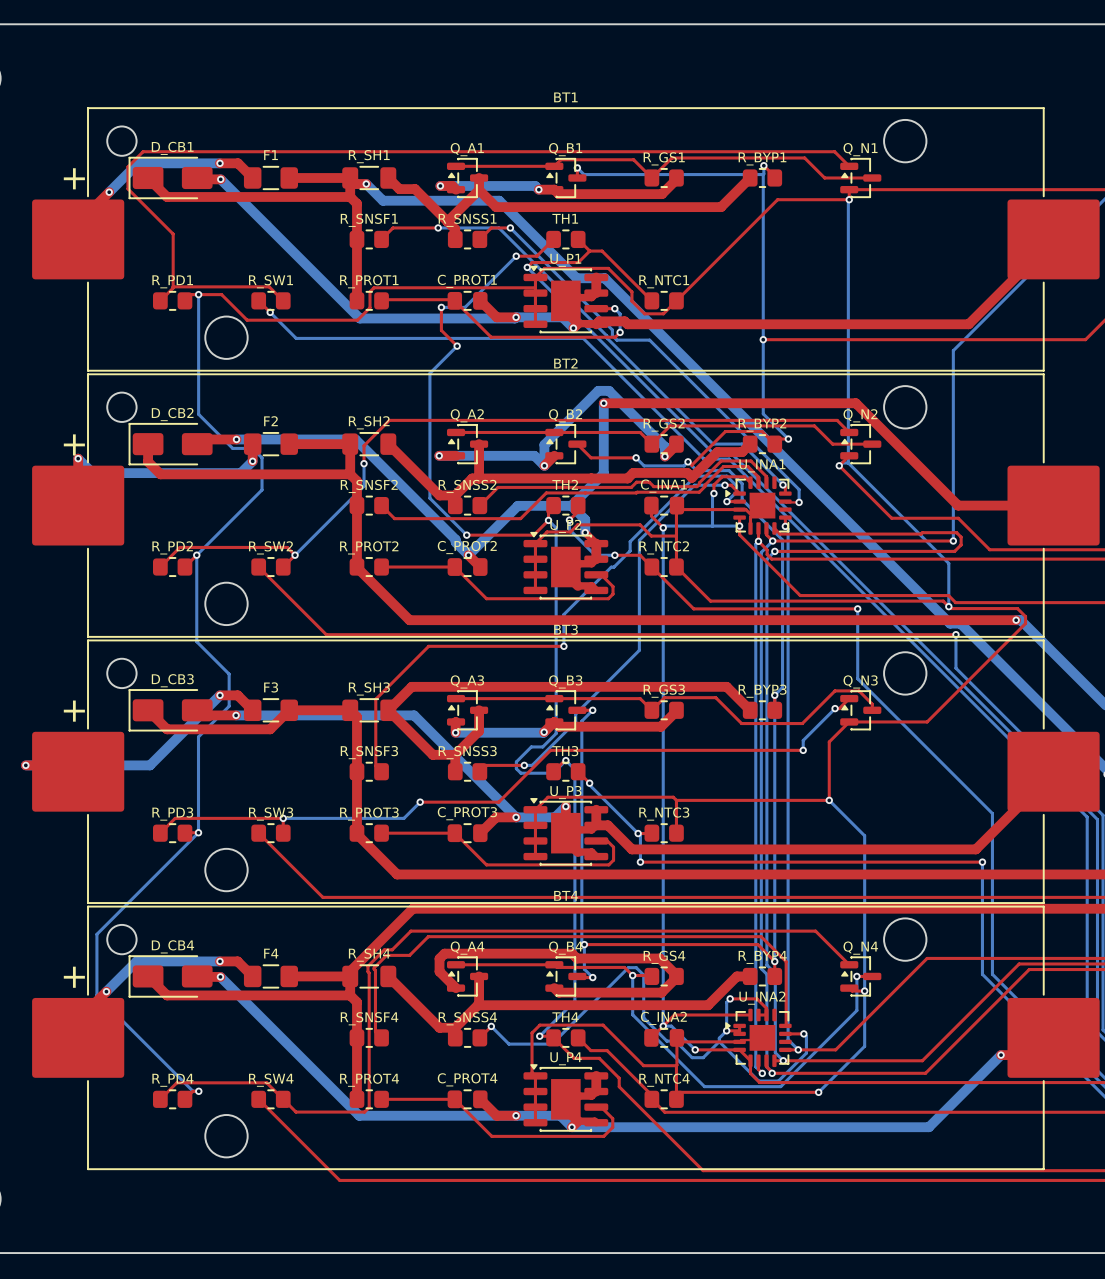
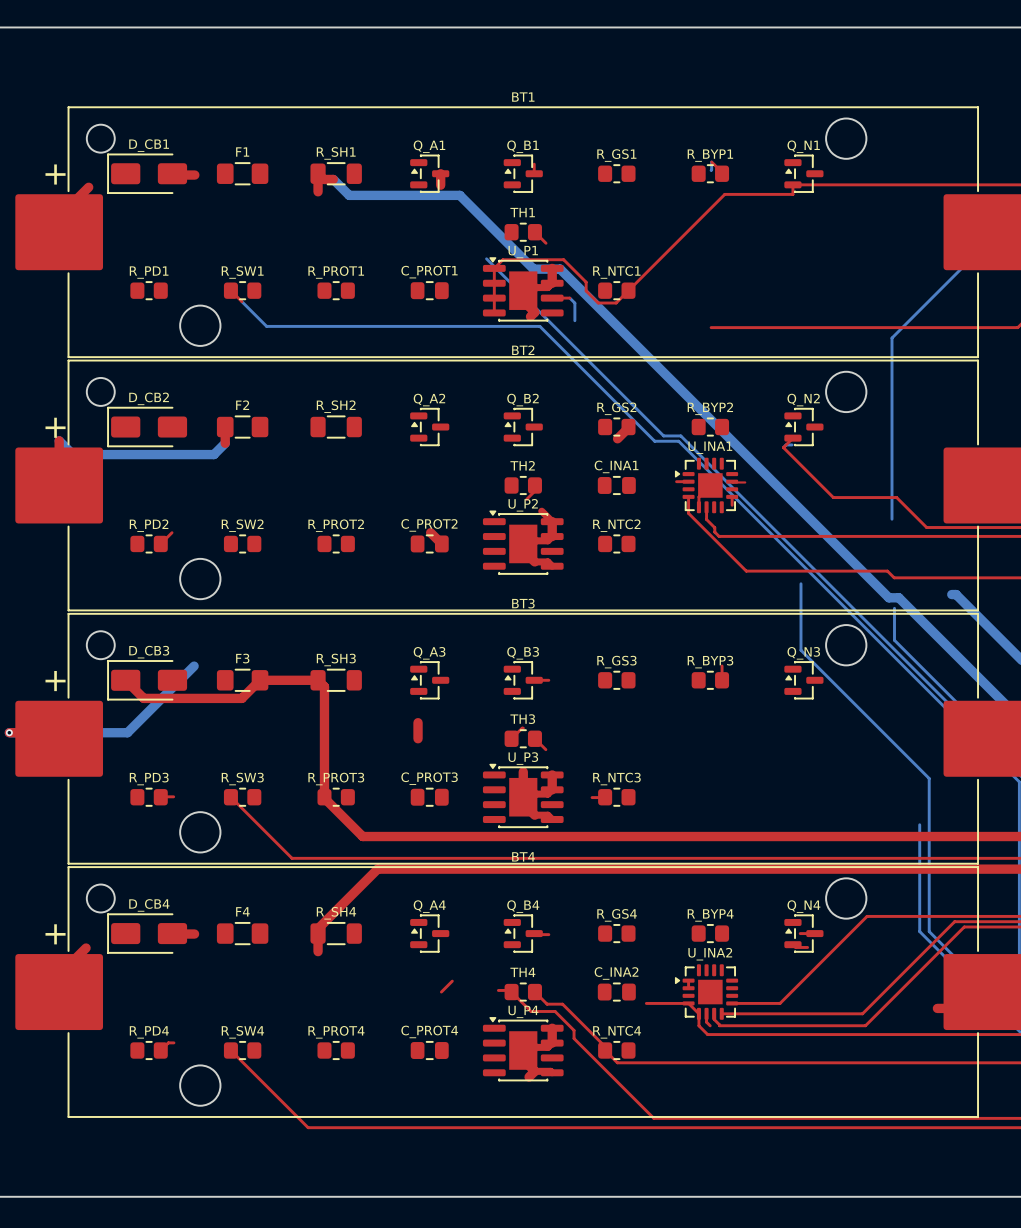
top track: (220, 163) (238, 163) (252, 177) -> none
bottom track: (220, 163) (138, 163) (109, 192) -> none
via: (220, 163) -> none
via: (763, 165) -> none
top track: (456, 166) (554, 166) (560, 159) (633, 159) (651, 177) (671, 157) (804, 157) (824, 177) (872, 177) -> none
top track: (849, 166) (834, 151) (143, 151) (127, 166) (127, 188) (173, 234) (173, 288) (160, 300) -> none
bottom track: (577, 167) (584, 174) (763, 174) (763, 413) (788, 439) -> none
via: (577, 167) -> none
top track: (148, 177) (167, 196) (350, 196) (356, 203) (356, 300) -> none
top track: (289, 177) (350, 177) -> none
top track: (388, 177) (399, 189) (415, 189) (455, 229) (455, 239) -> none
top track: (676, 177) (661, 194) (558, 194) (554, 189) (538, 189) -> none
top track: (750, 177) (721, 207) (496, 207) (479, 190) (447, 221) -> none
bottom track: (220, 179) (359, 318) (562, 317) (573, 328) -> none
via: (220, 179) -> none
via: (366, 183) -> none
top track: (440, 185) (452, 185) (456, 189) -> none
bottom track: (440, 185) (535, 185) (538, 189) -> none
via: (440, 185) -> none
via: (538, 189) -> none
via: (109, 192) -> none
bottom track: (849, 199) (848, 462) (948, 563) (948, 606) -> none
via: (849, 199) -> none
top track: (438, 227) (393, 227) (381, 239) -> none
bottom track: (438, 227) (498, 227) (713, 444) (742, 444) (782, 484) -> none
via: (438, 227) -> none
top track: (510, 227) (491, 227) (479, 239) -> none
bottom track: (510, 227) (612, 329) (612, 335) (616, 340) (649, 340) (799, 489) (799, 502) -> none
via: (510, 227) -> none
R_SNSF1: (369, 239) -> none
R_SNSS1: (467, 239) -> none
top track: (553, 239) (536, 256) (516, 256) -> none
top track: (1053, 239) (968, 324) (627, 324) (624, 321) (599, 321) (596, 324) (577, 323) -> none
bottom track: (516, 256) (465, 307) (441, 307) -> none
via: (516, 256) -> none
top track: (527, 267) (532, 262) (578, 262) (589, 251) (602, 251) (651, 300) -> none
via: (527, 267) -> none
top track: (173, 286) (269, 286) (283, 300) -> none
top track: (535, 287) (374, 287) (370, 291) (370, 307) (357, 320) (247, 320) (221, 294) (191, 294) (184, 300) -> none
bottom track: (198, 294) (198, 414) (232, 448) (252, 448) (262, 457) (262, 489) (196, 555) (196, 641) (229, 674) (229, 706) (198, 736) (198, 832) (96, 934) (96, 995) (193, 1091) (198, 1091) -> none
via: (198, 294) -> none
top track: (381, 300) (453, 299) (491, 337) (615, 337) (620, 332) -> none
top track: (480, 300) (496, 317) (516, 317) -> none
top track: (441, 307) (441, 330) (457, 346) -> none
via: (441, 307) -> none
via: (614, 308) -> none
via: (270, 312) -> none
via: (516, 317) -> none
via: (573, 328) -> none
via: (620, 332) -> none
via: (763, 339) -> none
bottom track: (457, 346) (429, 373) (429, 498) (466, 535) -> none
via: (457, 346) -> none
top track: (603, 403) (855, 403) (958, 505) (1053, 505) -> none
bottom track: (603, 403) (603, 473) (571, 505) -> none
via: (603, 403) -> none
top track: (456, 432) (640, 432) (651, 444) (670, 425) (814, 425) (832, 444) (872, 444) -> none
top track: (849, 432) (837, 420) (389, 420) (364, 445) (364, 463) -> none
top track: (236, 439) (201, 439) (197, 444) -> none
bottom track: (236, 439) (355, 439) (455, 539) (455, 542) (468, 555) (517, 505) (571, 505) -> none
via: (236, 439) -> none
top track: (788, 439) (779, 439) (774, 444) (762, 431) (725, 431) (691, 465) (688, 461) -> none
via: (788, 439) -> none
top track: (148, 444) (148, 461) (160, 474) (350, 474) -> none
top track: (289, 444) (350, 444) (350, 474) -> none
top track: (388, 444) (439, 495) (455, 495) -> none
top track: (479, 444) (479, 478) -> none
top track: (577, 444) (591, 457) (636, 457) -> none
top track: (750, 444) (742, 452) (717, 452) (691, 477) (687, 472) (633, 472) (627, 478) (472, 478) (455, 495) -> none
top track: (439, 455) (456, 455) -> none
bottom track: (439, 455) (534, 455) (544, 465) (544, 444) (598, 390) (609, 390) (664, 446) (664, 456) -> none
via: (439, 455) -> none
top track: (554, 455) (544, 465) -> none
via: (664, 456) -> none
bottom track: (636, 457) (644, 465) (684, 465) (688, 461) (696, 470) (729, 470) (742, 483) (742, 499) (782, 539) (782, 687) (774, 695) (774, 961) -> none
via: (636, 457) -> none
via: (78, 458) -> none
via: (252, 461) -> none
via: (688, 461) -> none
bottom track: (364, 463) (364, 486) (295, 555) -> none
via: (364, 463) -> none
via: (544, 465) -> none
via: (839, 465) -> none
top track: (350, 474) (356, 481) (356, 567) (409, 620) (1016, 620) -> none
top track: (750, 482) (744, 476) (722, 476) (713, 485) (713, 493) -> none
top track: (758, 482) (758, 477) (747, 466) (723, 466) (699, 492) (546, 492) (520, 518) (394, 518) (381, 505) -> none
top track: (766, 482) (766, 476) (750, 460) (721, 460) (696, 486) (653, 486) (649, 482) (636, 482) (631, 487) (498, 487) (479, 505) -> none
top track: (782, 484) (785, 487) (785, 493) -> none
via: (782, 484) -> none
top track: (724, 485) (731, 485) (739, 493) -> none
bottom track: (724, 485) (694, 485) (639, 540) (639, 650) (575, 714) (575, 721) (532, 765) (524, 765) -> none
via: (724, 485) -> none
bottom track: (713, 493) (712, 526) -> none
via: (713, 493) -> none
bottom track: (726, 501) (736, 491) (736, 485) (726, 476) (695, 476) (630, 541) (630, 550) (563, 614) (563, 646) -> none
via: (726, 501) -> none
via: (799, 502) -> none
R_SNSF2: (369, 505) -> none
R_SNSS2: (467, 505) -> none
top track: (553, 505) (548, 510) (548, 520) (533, 535) (466, 535) -> none
bottom track: (571, 505) (585, 519) (585, 532) -> none
top track: (651, 505) (651, 516) (663, 527) -> none
top track: (680, 509) (676, 514) (676, 567) (710, 601) (943, 601) (950, 608) (1017, 608) (1025, 616) (1025, 623) (927, 721) (849, 721) (829, 741) (829, 800) (676, 800) -> none
top track: (680, 509) (745, 509) (752, 515) -> none
bottom track: (548, 520) (556, 528) (556, 733) (542, 746) (531, 746) (516, 761) (516, 768) (520, 773) (553, 773) (565, 760) (574, 769) (574, 1001) (539, 1036) -> none
via: (548, 520) -> none
bottom track: (569, 520) (569, 529) (595, 555) (614, 555) -> none
via: (569, 520) -> none
bottom track: (739, 526) (665, 526) (663, 527) (663, 1026) (671, 1026) (695, 1049) -> none
via: (739, 526) -> none
bottom track: (785, 526) (788, 529) (788, 1039) (798, 1049) -> none
via: (785, 526) -> none
via: (663, 527) -> none
top track: (766, 528) (766, 534) (772, 541) (953, 541) -> none
top track: (774, 528) (780, 534) (956, 532) (961, 537) (961, 544) (954, 551) (774, 551) -> none
via: (585, 532) -> none
via: (466, 535) -> none
top track: (676, 536) (651, 536) (640, 524) (577, 524) (570, 531) (547, 531) (535, 543) (535, 590) -> none
bottom track: (758, 541) (755, 544) (755, 1066) (762, 1073) -> none
via: (758, 541) -> none
bottom track: (772, 541) (761, 552) (761, 968) (766, 974) (766, 1067) (772, 1073) -> none
via: (772, 541) -> none
via: (953, 541) -> none
bottom track: (774, 551) (766, 559) (766, 965) (775, 973) (775, 1052) (783, 1060) -> none
via: (774, 551) -> none
via: (196, 555) -> none
via: (295, 555) -> none
via: (468, 555) -> none
top track: (614, 555) (640, 555) (693, 608) (857, 608) -> none
via: (614, 555) -> none
top track: (160, 567) (179, 547) (287, 547) (295, 555) (283, 567) -> none
top track: (258, 567) (326, 634) (955, 634) -> none
top track: (381, 567) (454, 567) (486, 598) (608, 598) (613, 594) (613, 586) (601, 574) (596, 574) -> none
via: (948, 606) -> none
via: (857, 608) -> none
via: (1016, 620) -> none
via: (955, 634) -> none
top track: (563, 646) (428, 646) (375, 699) (375, 765) (381, 771) -> none
via: (563, 646) -> none
top track: (220, 695) (237, 695) (252, 710) -> none
via: (220, 695) -> none
via: (774, 695) -> none
top track: (456, 698) (640, 698) (651, 710) (664, 697) (715, 697) (741, 723) (802, 723) (835, 690) (859, 690) (872, 704) (872, 710) -> none
top track: (849, 698) (839, 708) (835, 708) -> none
bottom track: (835, 708) (803, 740) (803, 750) -> none
via: (835, 708) -> none
top track: (197, 710) (202, 715) (236, 715) -> none
top track: (479, 710) (479, 731) (455, 754) (432, 754) (388, 710) (411, 686) (726, 686) (750, 710) -> none
bottom track: (592, 710) (581, 721) (581, 942) (584, 944) (584, 969) (592, 977) -> none
via: (592, 710) -> none
top track: (676, 710) (661, 726) (559, 726) (554, 721) (544, 732) -> none
bottom track: (236, 715) (414, 715) (516, 817) (555, 817) (565, 806) -> none
via: (236, 715) -> none
top track: (456, 721) (455, 732) -> none
via: (455, 732) -> none
bottom track: (544, 732) (455, 732) -> none
via: (544, 732) -> none
top track: (803, 750) (550, 750) (498, 802) (420, 802) -> none
via: (803, 750) -> none
via: (565, 760) -> none
top track: (524, 765) (486, 765) (479, 771) -> none
via: (524, 765) -> none
R_SNSF3: (369, 771) -> none
R_SNSS3: (467, 771) -> none
top track: (1053, 771) (975, 849) (632, 849) (607, 825) (596, 825) -> none
bottom track: (589, 783) (640, 835) (640, 862) -> none
via: (589, 783) -> none
top track: (676, 800) (673, 797) (548, 797) (535, 809) (535, 856) -> none
top track: (676, 800) (676, 833) -> none
bottom track: (829, 800) (864, 835) (864, 1046) (818, 1092) -> none
via: (829, 800) -> none
bottom track: (420, 802) (403, 818) (283, 818) -> none
via: (420, 802) -> none
via: (565, 806) -> none
top track: (516, 817) (496, 817) (480, 833) -> none
via: (516, 817) -> none
via: (283, 818) -> none
via: (198, 832) -> none
top track: (160, 833) (175, 818) (283, 818) (283, 833) -> none
top track: (381, 833) (454, 833) (486, 864) (608, 864) (613, 860) (613, 847) (607, 840) (596, 840) -> none
via: (638, 833) -> none
top track: (640, 862) (982, 862) -> none
via: (640, 862) -> none
via: (982, 862) -> none
top track: (584, 944) (757, 944) (774, 961) (774, 976) -> none
via: (584, 944) -> none
top track: (220, 961) (237, 961) (252, 976) -> none
bottom track: (220, 961) (136, 961) (106, 991) -> none
via: (220, 961) -> none
via: (774, 961) -> none
top track: (456, 964) (554, 964) (557, 967) (624, 967) (632, 975) (651, 976) -> none
top track: (849, 964) (815, 931) (410, 931) (392, 949) (384, 949) (367, 966) (369, 1107) (364, 1112) (295, 1112) (266, 1082) (176, 1082) (160, 1099) -> none
bottom track: (632, 975) (632, 1014) (704, 1086) (780, 1086) (856, 1010) (856, 976) -> none
via: (632, 975) -> none
top track: (148, 976) (167, 995) (350, 995) (356, 1002) (356, 1099) -> none
bottom track: (220, 976) (359, 1115) (560, 1115) (571, 1127) (928, 1127) (1001, 1055) -> none
via: (220, 976) -> none
top track: (289, 976) (350, 976) -> none
top track: (388, 976) (439, 1027) (455, 1027) -> none
top track: (479, 976) (479, 1005) -> none
top track: (750, 976) (736, 976) (708, 1005) (477, 1005) (455, 1027) -> none
via: (856, 976) -> none
via: (592, 977) -> none
top track: (456, 988) (439, 971) (439, 958) (444, 953) (572, 953) (576, 958) (659, 958) (676, 975) (676, 977) (661, 992) (558, 992) (554, 988) -> none
via: (106, 991) -> none
via: (864, 991) -> none
top track: (730, 998) (757, 998) (766, 1008) (766, 1015) (758, 1015) -> none
bottom track: (730, 998) (726, 1002) (726, 1030) (719, 1038) (719, 1041) -> none
via: (730, 998) -> none
top track: (750, 1015) (674, 1015) (651, 1037) -> none
top track: (785, 1025) (786, 961) (761, 936) (428, 936) (409, 955) (386, 955) (374, 967) (375, 1031) (381, 1037) -> none
bottom track: (491, 1026) (508, 1044) (552, 1044) (628, 967) (636, 967) (643, 975) (643, 1017) (666, 1041) (675, 1041) (692, 1057) (703, 1057) (719, 1041) -> none
via: (491, 1026) -> none
via: (663, 1026) -> none
top track: (726, 1030) (739, 1030) -> none
via: (726, 1030) -> none
top track: (785, 1033) (803, 1033) -> none
bottom track: (803, 1033) (806, 1036) (806, 1053) (778, 1081) (758, 1081) (719, 1041) -> none
via: (803, 1033) -> none
via: (539, 1036) -> none
R_SNSF4: (369, 1037) -> none
R_SNSS4: (467, 1037) -> none
top track: (676, 1037) (676, 1065) -> none
top track: (762, 1037) (762, 1040) (741, 1040) (739, 1041) (676, 1041) -> none
via: (695, 1049) -> none
via: (798, 1049) -> none
via: (1001, 1055) -> none
via: (783, 1060) -> none
top track: (676, 1065) (676, 1099) -> none
top track: (676, 1065) (643, 1065) (603, 1025) (539, 1025) (532, 1033) (532, 1072) (535, 1075) (535, 1122) -> none
via: (762, 1073) -> none
via: (772, 1073) -> none
via: (198, 1091) -> none
top track: (676, 1092) (818, 1092) -> none
via: (818, 1092) -> none
top track: (381, 1099) (454, 1099) (491, 1136) (603, 1136) (612, 1127) (612, 1118) (601, 1107) (596, 1107) -> none
top track: (480, 1099) (496, 1115) (516, 1115) -> none
via: (516, 1115) -> none
via: (571, 1127) -> none

